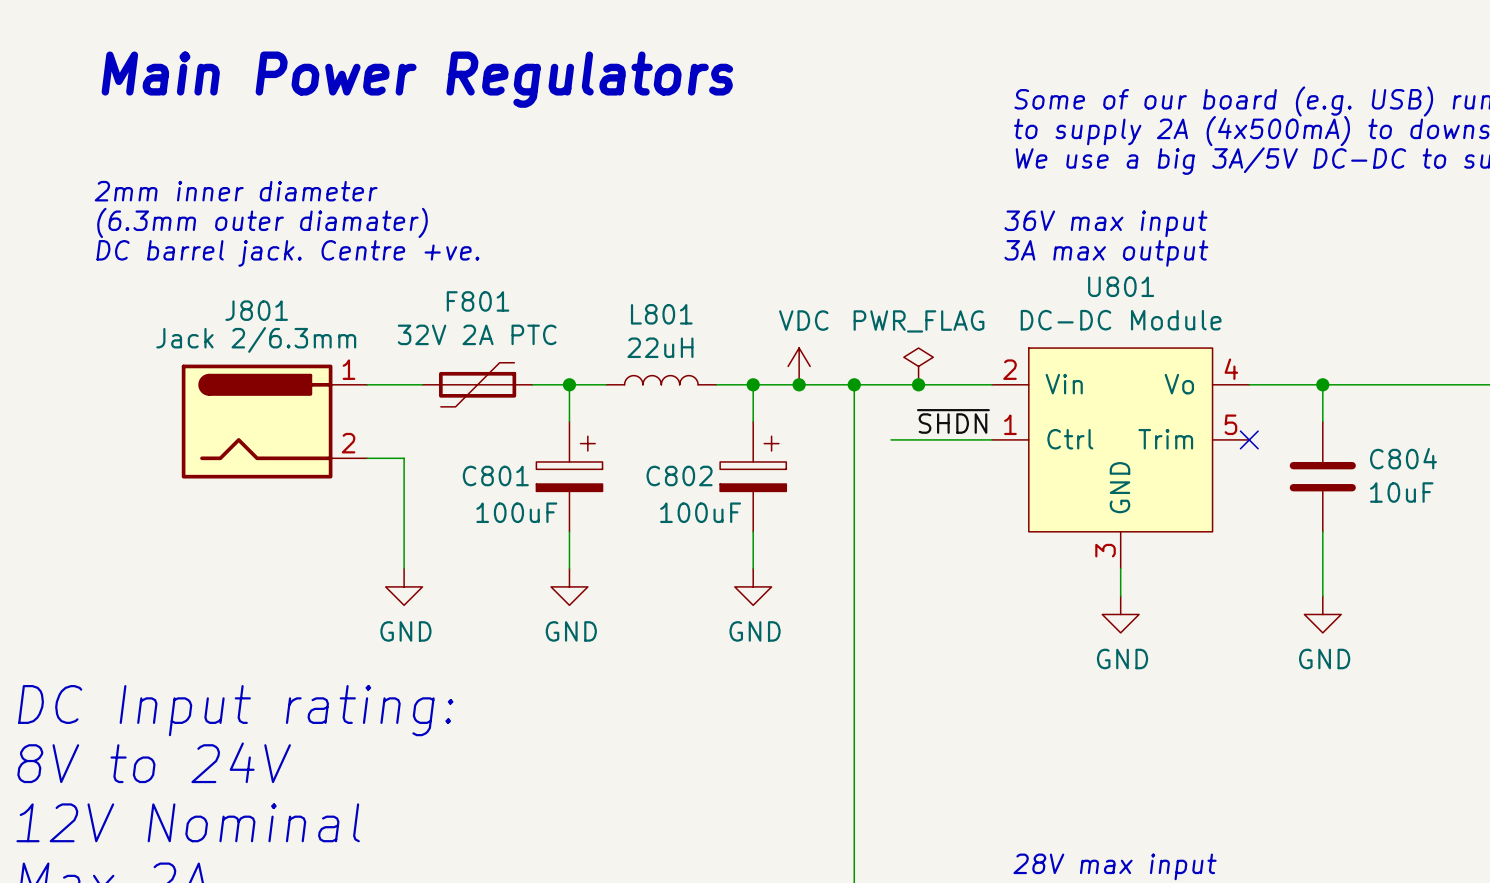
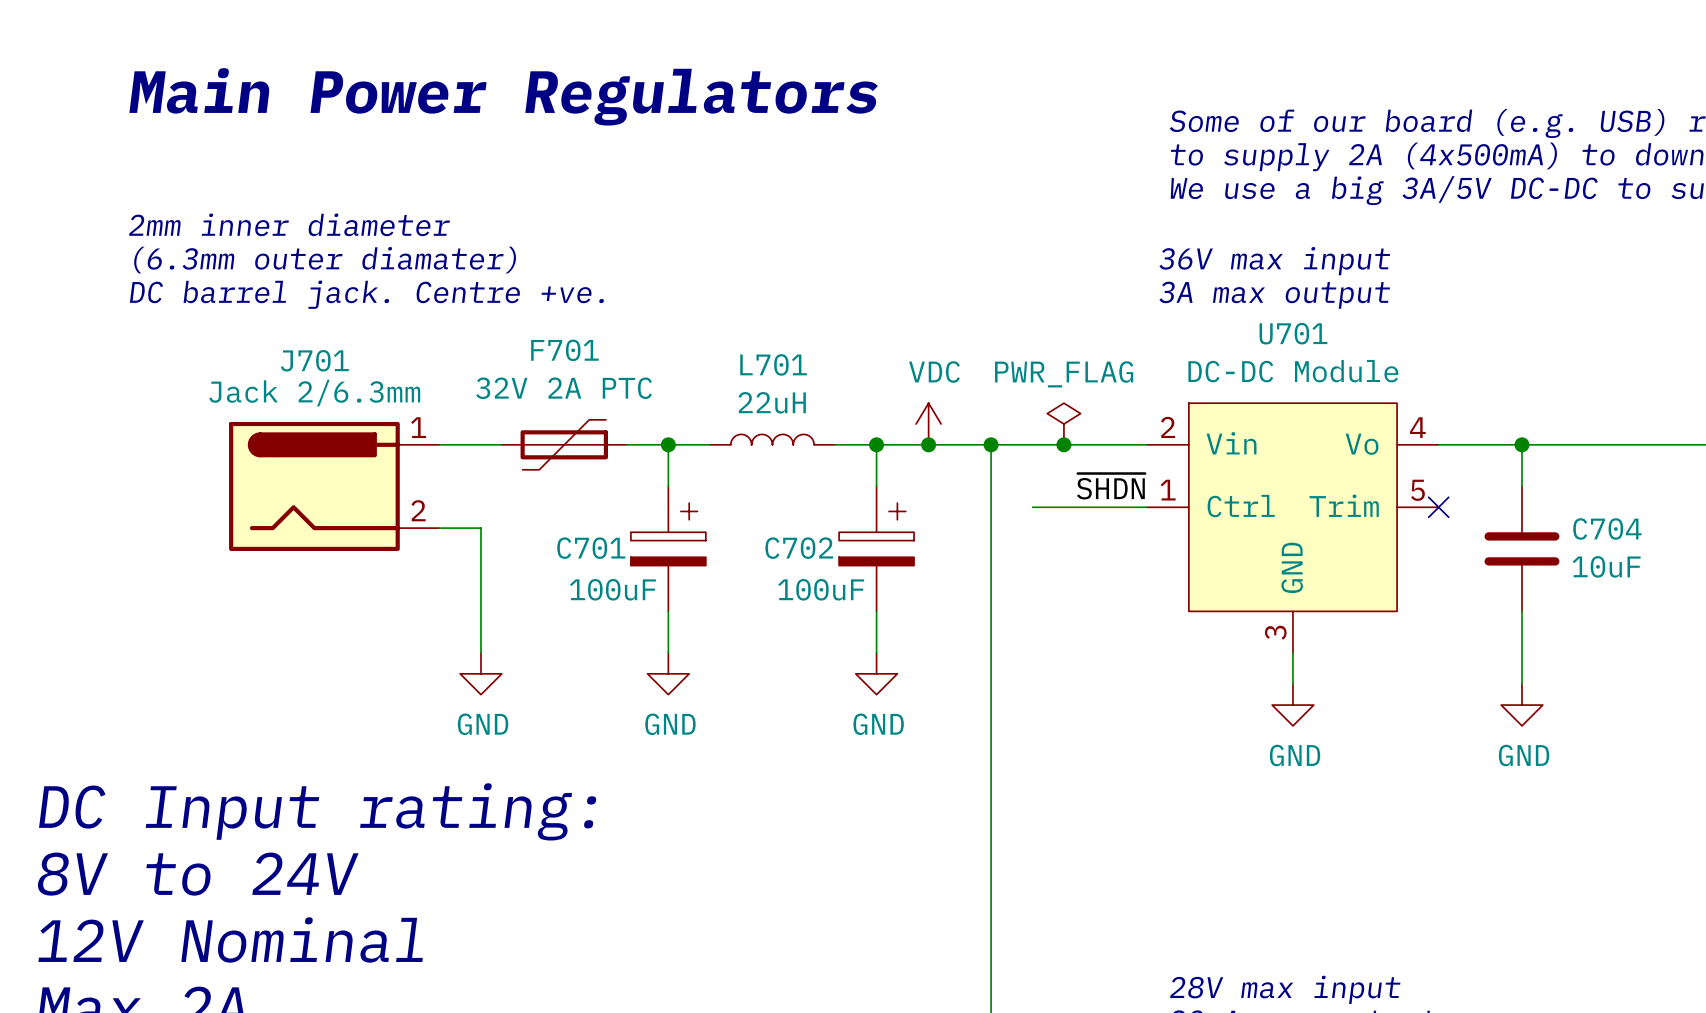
U801 name: U801 (1121, 286) -> U701 (1293, 333)
F801 name: F801 (478, 301) -> F701 (564, 350)
J801 name: J801 (256, 310) -> J701 (314, 360)
L801 name: L801 (661, 314) -> L701 (773, 364)
C804 name: C804 (1403, 458) -> C704 (1607, 528)
C801 name: C801 (495, 475) -> C701 (591, 548)
C802 name: C802 (679, 475) -> C702 (799, 548)

